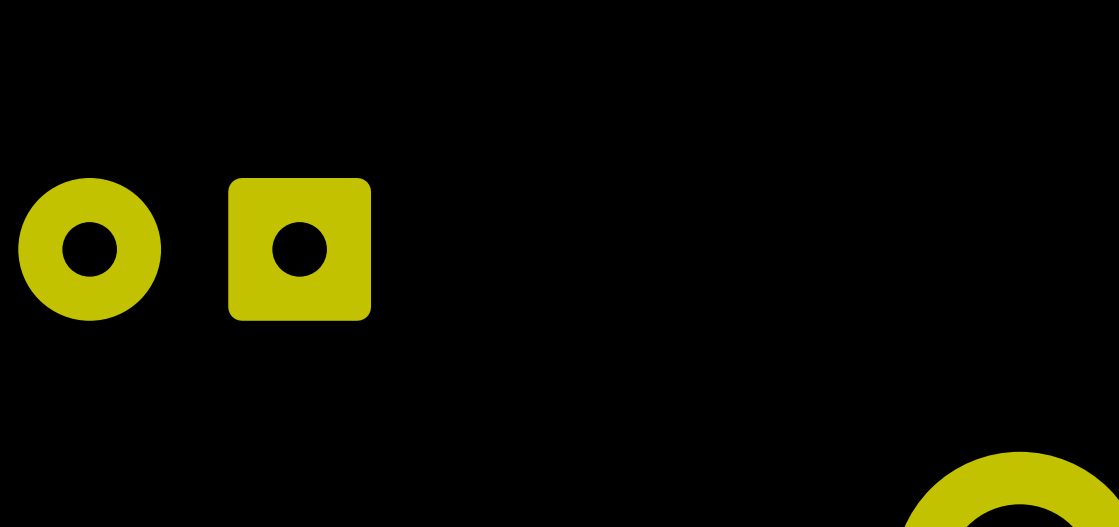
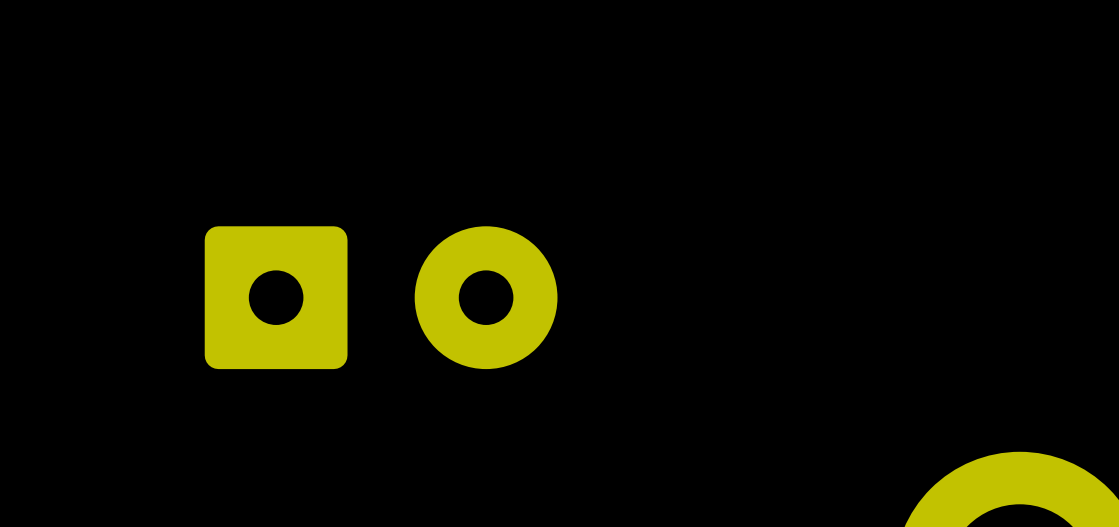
part rotation: 0° (194, 249) -> 180° (381, 297)

